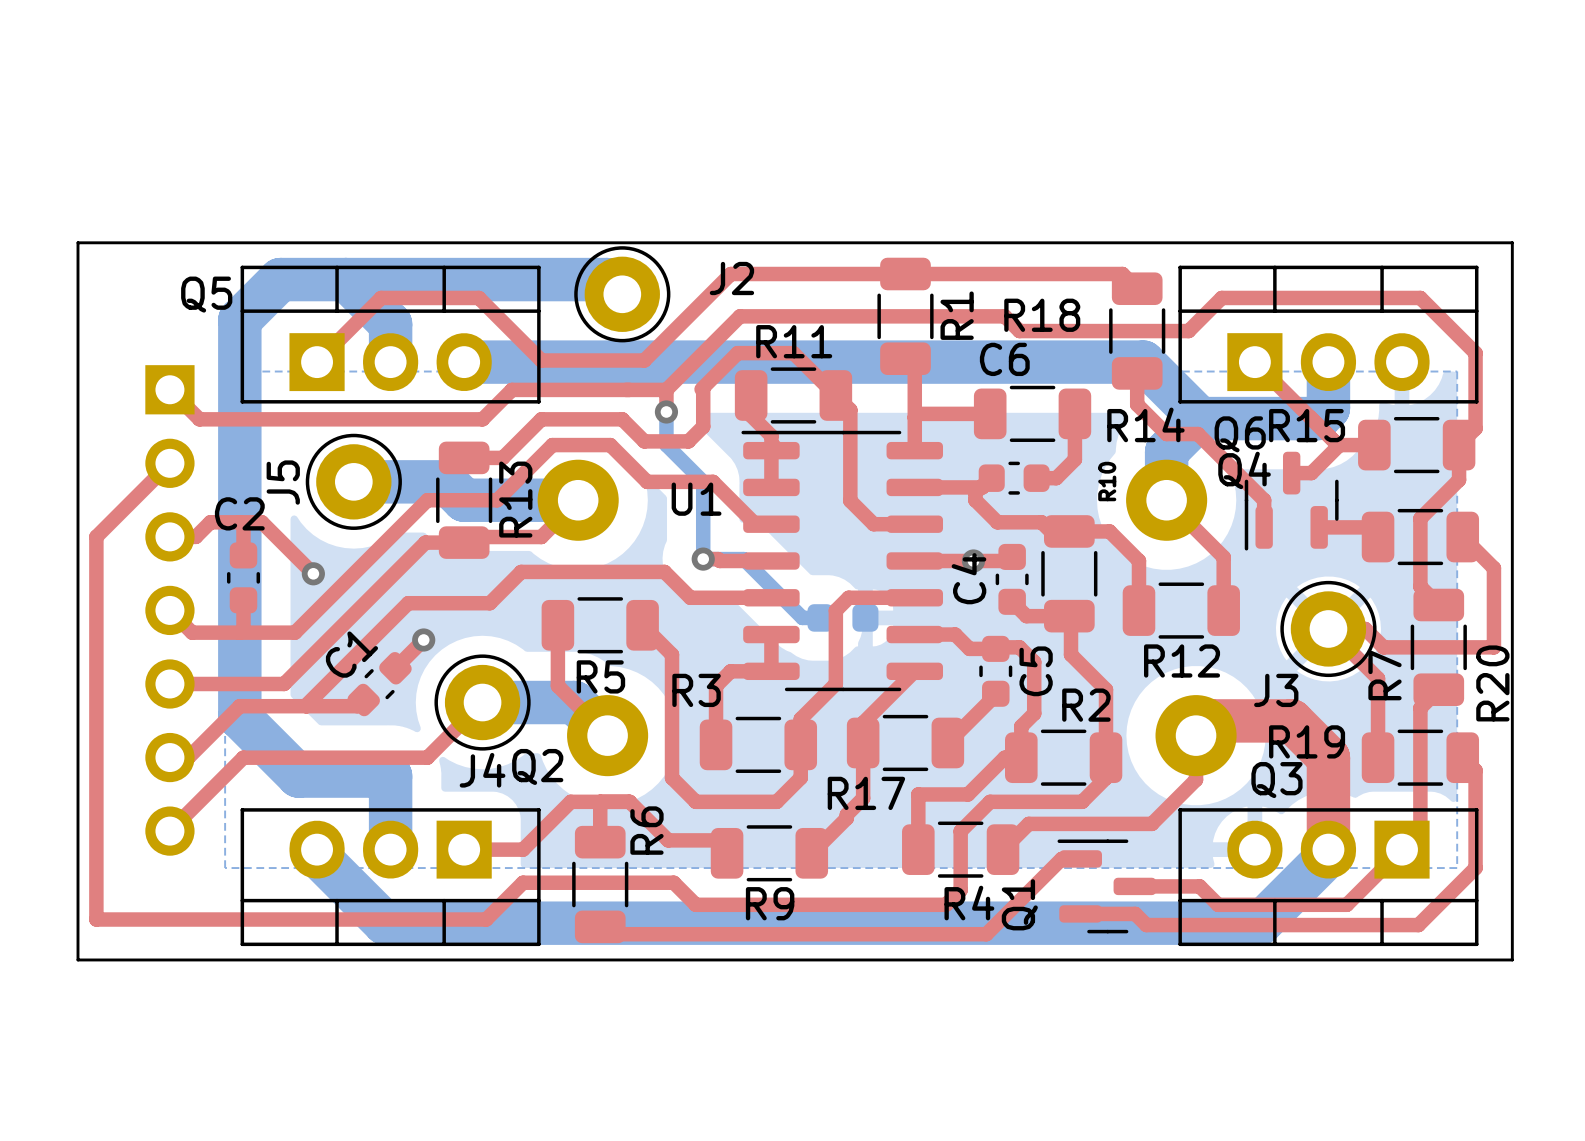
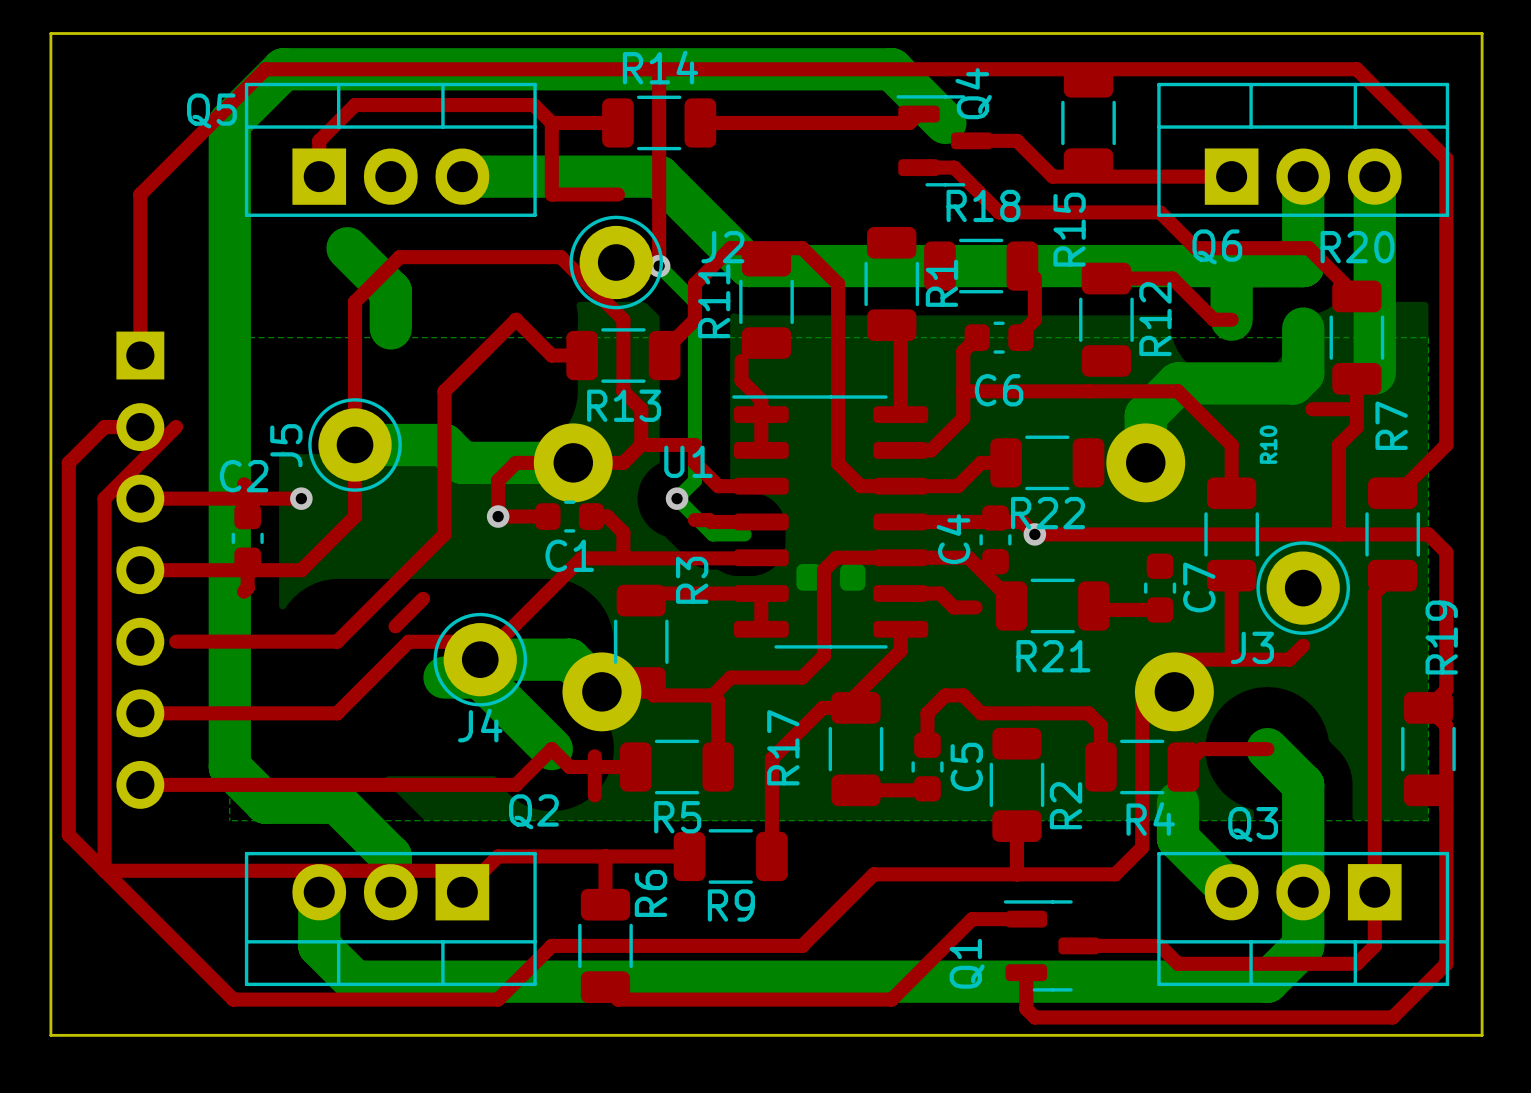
top track: none -> (659, 69) (659, 266)
top track: none -> (918, 114) (909, 122) (700, 122)
top track: none -> (551, 122) (617, 122)
top track: none -> (551, 122) (551, 194) (617, 194)
top track: none -> (551, 122) (533, 105) (355, 105) (319, 140) (319, 176)
bottom track: none -> (945, 122) (891, 69) (283, 69) (229, 122) (229, 767) (265, 802) (337, 802) (390, 856) (390, 892)
top track: none -> (971, 140) (1016, 140) (1052, 176) (1231, 176)
top track: none -> (918, 167) (954, 167) (999, 212) (1160, 212) (1195, 248) (1308, 248) (1356, 296)
bottom track: none -> (462, 176) (659, 176) (748, 266) (1303, 266) (1303, 176)
bottom track: none -> (1374, 176) (1374, 373)
board edge: (1512, 242) (77, 242) (77, 959) (1512, 959) -> (1482, 212) (1482, 33) (50, 33) (50, 1035) (1482, 1035) (1482, 910)
top track: (1137, 288) (1122, 274) (730, 274) (644, 360) (541, 360) (478, 297) (381, 297) (317, 362) -> none
bottom track: (622, 294) (607, 279) (280, 279) (239, 320) (239, 717) (298, 776) (390, 776) (390, 849) -> none
via: none -> (659, 266)
top track: none -> (1022, 266) (1034, 278) (1034, 319) (1020, 333) (1020, 337)
bottom track: none -> (1231, 266) (1231, 319)
top track: none -> (1106, 278) (1172, 278) (1213, 319) (1231, 319)
R18 name position: R18 (1042, 315) -> R18 (983, 205)
R14 rotation: 0° (1137, 331) -> 90° clockwise (659, 122)
R14 position: (1137, 331) -> (659, 122)
Q5 position: (390, 334) -> (390, 149)
Q6 position: (1328, 334) -> (1303, 149)
R11 name position: R11 (794, 341) -> R11 (714, 301)
top track: (703, 353) (740, 316) (1004, 316) (1019, 331) (1188, 331) (1221, 297) (1420, 297) (1475, 353) -> (140, 355) (140, 194) (265, 69) (1356, 69) (1446, 158) (1446, 319)
C6 name position: C6 (1004, 359) -> C6 (999, 390)
bottom track: (464, 362) (1143, 362) (1199, 418) -> none
top track: (1254, 362) (1338, 445) (1311, 473) (1291, 473) -> none
top track: (1137, 373) (1137, 404) (1166, 434) (1197, 434) (1264, 500) (1264, 527) -> none
top track: (169, 389) (199, 419) (482, 419) (511, 389) (556, 389) -> none
top track: (587, 389) (666, 389) (666, 411) -> none
top track: (701, 389) (737, 353) (793, 353) (850, 409) -> (694, 319) (694, 283) (730, 248) (802, 248) (838, 283) (838, 375)
top track: (703, 389) (703, 426) (688, 441) (644, 441) -> (591, 462) (623, 462) (641, 444) (641, 409) (637, 405)
R11 rotation: 0° (793, 395) -> 90° clockwise (766, 301)
bottom track: (666, 411) (666, 445) (703, 481) -> (659, 266) (694, 301) (694, 444)
via: (666, 411) -> none
top track: (990, 413) (918, 413) (914, 417) -> none
R18 position: (1032, 413) -> (981, 266)
top track: (1074, 413) (1074, 459) (1056, 478) (1036, 478) -> none
top track: none -> (1356, 378) (1356, 427) (1338, 444) (1338, 534)
R14 name position: R14 (1145, 424) -> R14 (660, 67)
R15 name position: R15 (1307, 425) -> R15 (1069, 229)
top track: (629, 426) (622, 419) (541, 419) (502, 457) (464, 457) -> (623, 391) (623, 319) (560, 257) (399, 257) (355, 301) (355, 516) (301, 570) (140, 570)
top track: none -> (963, 391) (1177, 391) (1231, 444) (1231, 493)
top track: (1475, 428) (1459, 445) (1459, 479) (1420, 518) (1420, 586) (1438, 605) -> (1446, 393) (1446, 444) (1398, 493) (1392, 493)
R15 rotation: 0° (1416, 445) -> 90° clockwise (1088, 122)
R15 position: (1416, 445) -> (1088, 122)
top track: none -> (140, 427) (104, 427) (68, 462) (68, 834) (233, 999) (498, 999) (551, 945) (802, 945) (873, 874) (1115, 874) (1142, 847) (1142, 695) (1177, 659) (1289, 659) (1303, 645)
C6 position: (1014, 478) -> (999, 337)
top track: (648, 481) (610, 445) (552, 445) (497, 500) (427, 500) (294, 632) (192, 632) (169, 610) -> none
top track: (703, 481) (713, 481) (755, 524) -> (694, 444) (694, 462) (718, 486) (745, 486)
top track: (945, 487) (982, 487) (991, 478) (990, 478) (975, 492) (975, 500) (997, 522) (1041, 522) (1050, 531) (1109, 531) (1138, 560) (1138, 610) -> (931, 450) (963, 418) (963, 351) (977, 337)
R13 rotation: 0° (464, 500) -> 90° clockwise (623, 355)
R13 position: (464, 500) -> (623, 355)
top track: none -> (547, 462) (516, 462) (498, 480) (498, 516) (547, 516)
top track: (578, 500) (541, 537) (469, 537) (464, 542) (425, 542) (284, 683) -> (551, 355) (516, 319) (444, 391) (444, 534) (337, 641) (287, 641)
top track: none -> (1006, 462) (981, 462) (957, 486) (900, 486)
R22: none -> (1047, 462)
top track: (1166, 500) (1223, 557) (1223, 610) -> none
Q4 rotation: 0° (1291, 501) -> 90° clockwise (944, 140)
Q4 position: (1291, 501) -> (944, 140)
bottom track: (703, 518) (703, 559) (743, 559) (802, 617) (820, 617) -> (694, 480) (677, 498) (712, 534) (744, 534)
top track: (1319, 527) (1368, 527) (1378, 537) -> none
top track: (169, 536) (195, 536) (210, 522) (261, 522) (313, 573) -> none
top track: none -> (140, 498) (301, 498)
R20 rotation: 0° (1420, 537) -> 90° clockwise (1356, 337)
R20 position: (1420, 537) -> (1356, 337)
top track: (1462, 537) (1493, 568) (1493, 647) (1383, 647) (1365, 628) (1328, 628) (1378, 678) (1378, 757) -> none
via: none -> (498, 516)
top track: none -> (591, 516) (607, 516) (623, 532) (623, 558)
via position: (703, 559) -> (677, 498)
via position: (973, 560) -> (1034, 534)
top track: none -> (993, 521) (1022, 521) (1034, 534) (1428, 534) (1446, 552) (1446, 690) (1428, 707)
via position: (313, 573) -> (301, 498)
R10 position: (1069, 573) -> (1231, 534)
top track: (771, 597) (690, 597) (664, 571) (521, 571) (489, 603) (408, 603) (306, 705) -> (761, 557) (581, 558) (498, 641) (408, 641) (337, 713)
top track: none -> (900, 557) (968, 557) (1011, 600) (1011, 605)
top track: (1012, 601) (1026, 616) (1069, 616) (1071, 617) (1071, 654) (1106, 689) (1106, 777) (1082, 801) (990, 801) (960, 831) (960, 890) (945, 904) (697, 904) -> none
part position: (169, 610) -> (140, 570)
R12 rotation: 0° (1181, 610) -> 90° clockwise (1106, 319)
R12 position: (1181, 610) -> (1106, 319)
top track: none -> (1231, 575) (1231, 659)
top track: none -> (1392, 575) (1374, 593) (1374, 945) (1356, 963) (1177, 963) (1160, 945) (1079, 945)
top track: (557, 625) (557, 685) (607, 735) -> none
R5 position: (600, 625) -> (677, 767)
top track: (642, 625) (672, 654) (672, 777) (695, 801) (776, 801) (800, 777) (800, 719) (835, 683) -> (712, 695) (730, 677) (802, 677) (823, 655) (823, 641)
C7: none -> (1160, 588)
top track: none -> (761, 593) (648, 593) (641, 600)
via: (423, 640) -> none
R21: none -> (1052, 605)
top track: none -> (1093, 605) (1097, 609) (1160, 609)
R7 position: (1438, 647) -> (1392, 534)
top track: (995, 648) (1019, 647) (1034, 662) (1034, 713) (1021, 726) (1021, 757) -> (1100, 767) (1100, 725) (1088, 713) (1004, 713)
C1 name position: C1 (351, 654) -> C1 (569, 555)
R12 name position: R12 (1182, 660) -> R12 (1155, 319)
top track: (771, 671) (730, 671) (716, 686) (716, 744) -> none
top track: (914, 671) (863, 722) (863, 798) (846, 814) (846, 818) (811, 853) -> (900, 629) (900, 650) (855, 695) (855, 707) (822, 707) (771, 758) (771, 856)
C5 position: (995, 671) -> (927, 767)
R7 name position: R7 (1384, 675) -> R7 (1391, 425)
R20 name position: R20 (1492, 683) -> R20 (1357, 247)
C1 rotation: 0° (379, 684) -> 45° clockwise (569, 516)
C1 position: (379, 684) -> (569, 516)
top track: (1438, 689) (1420, 708) (1420, 831) (1346, 904) (1218, 904) (1199, 886) (1134, 886) -> none
top track: (995, 693) (947, 742) -> none
top track: (363, 700) (357, 706) (306, 705) -> none
top track: (482, 702) (427, 757) (335, 757) -> none
top track: (306, 705) (239, 706) (188, 757) (169, 757) -> none
bottom track: none -> (444, 677) (480, 677) (551, 749)
top track: none -> (641, 682) (653, 695) (712, 695)
top track: none -> (712, 695) (718, 700) (718, 767)
R17 rotation: 0° (905, 742) -> 90° clockwise (855, 749)
R3 rotation: 0° (758, 744) -> 90° clockwise (641, 641)
R3 position: (758, 744) -> (641, 641)
top track: (243, 757) (169, 831) -> (247, 713) (140, 713)
top track: (1004, 757) (968, 794) (918, 794) (918, 849) -> (988, 713) (981, 713) (963, 695) (945, 695) (927, 713) (927, 745)
R2 rotation: 0° (1063, 757) -> 90° clockwise (1016, 784)
R2 position: (1063, 757) -> (1016, 784)
R19 rotation: 0° (1420, 757) -> 90° clockwise (1428, 749)
bottom track: none -> (1267, 749) (1303, 784) (1303, 802)
top track: none -> (1267, 749) (1201, 749) (1183, 767)
top track: none -> (635, 767) (569, 767) (551, 749) (516, 784) (140, 784)
top track: none -> (927, 788) (855, 790)
top track: (725, 840) (668, 840) (629, 801) (570, 801) (523, 849) (464, 849) -> none
bottom track: (317, 849) (317, 855) (384, 923) (1260, 923) (1328, 855) -> (319, 892) (319, 945) (355, 981) (1267, 981) (1303, 945) (1303, 808)
R4 position: (960, 849) -> (1142, 767)
top track: (1003, 849) (1028, 823) (1151, 823) (1196, 779) (1196, 735) (1210, 720) (1291, 720) (1328, 757) (1328, 849) -> none
bottom track: none -> (1177, 802) (1177, 838) (1231, 892)
R9 position: (769, 853) -> (730, 856)
top track: (1080, 858) (1061, 858) (986, 934) (607, 934) (600, 926) -> none
top track: (1475, 868) (1418, 925) (1146, 925) (1135, 913) (1080, 913) -> (1446, 820) (1446, 963) (1392, 1017) (1034, 1017) (1026, 1008) (1026, 972)
top track: none -> (1016, 826) (1016, 874)
Q2 position: (390, 877) -> (390, 918)
Q3 position: (1328, 877) -> (1303, 918)
R6 position: (600, 884) -> (605, 945)
Q1 position: (1106, 886) -> (1051, 945)
top track: (500, 904) (523, 882) (673, 882) (695, 904) -> (498, 856) (687, 856)
top track: none -> (605, 856) (605, 904)
top track: none -> (1026, 919) (972, 919) (891, 999) (617, 999) (605, 987)

